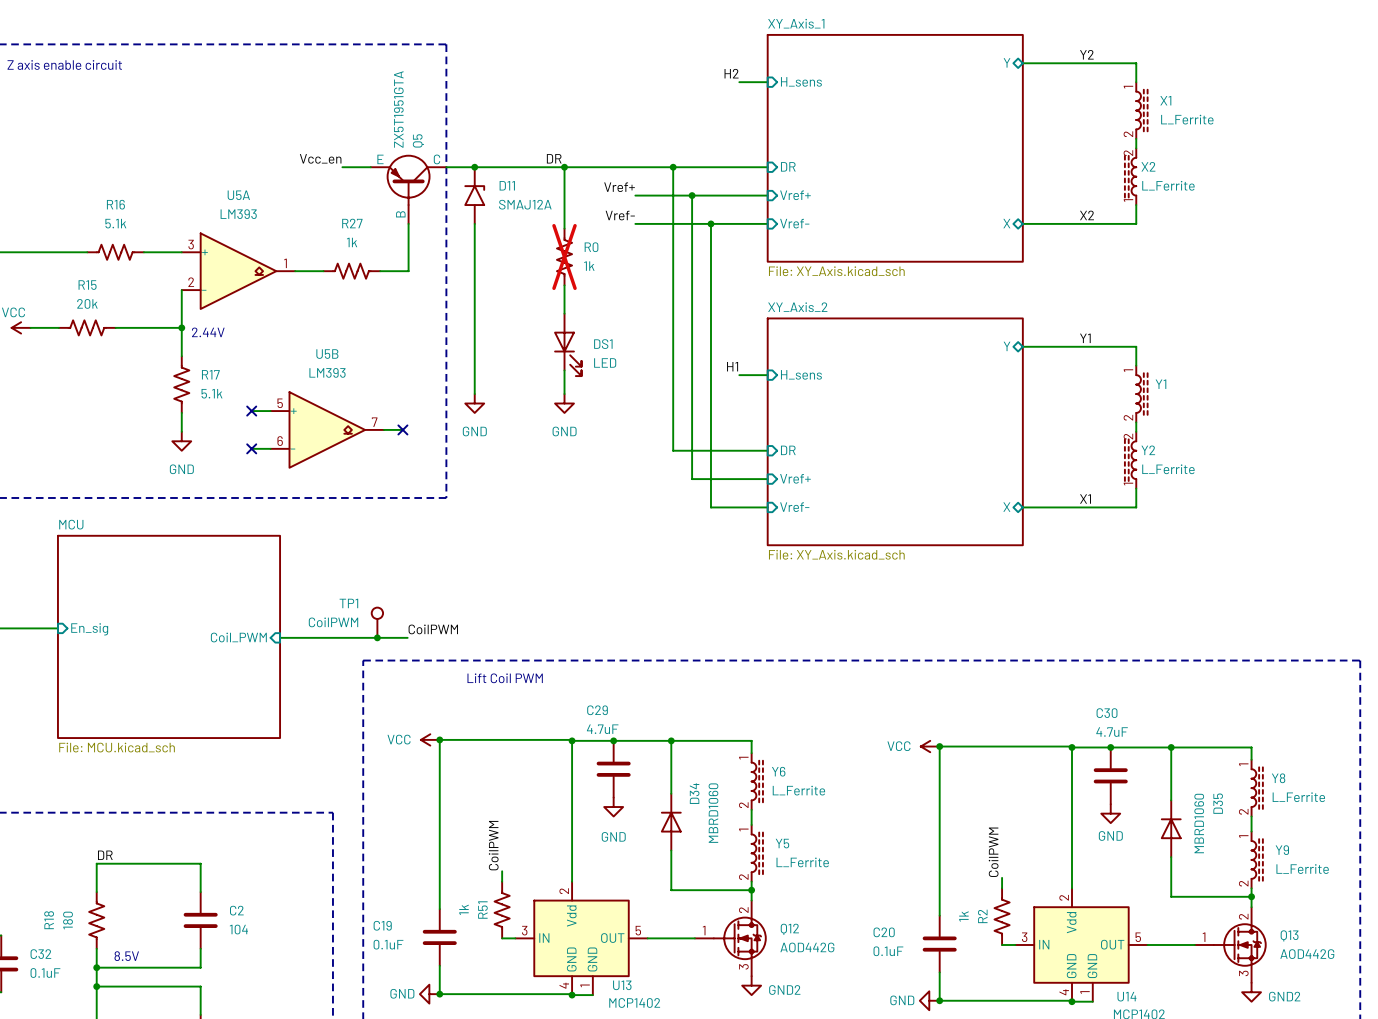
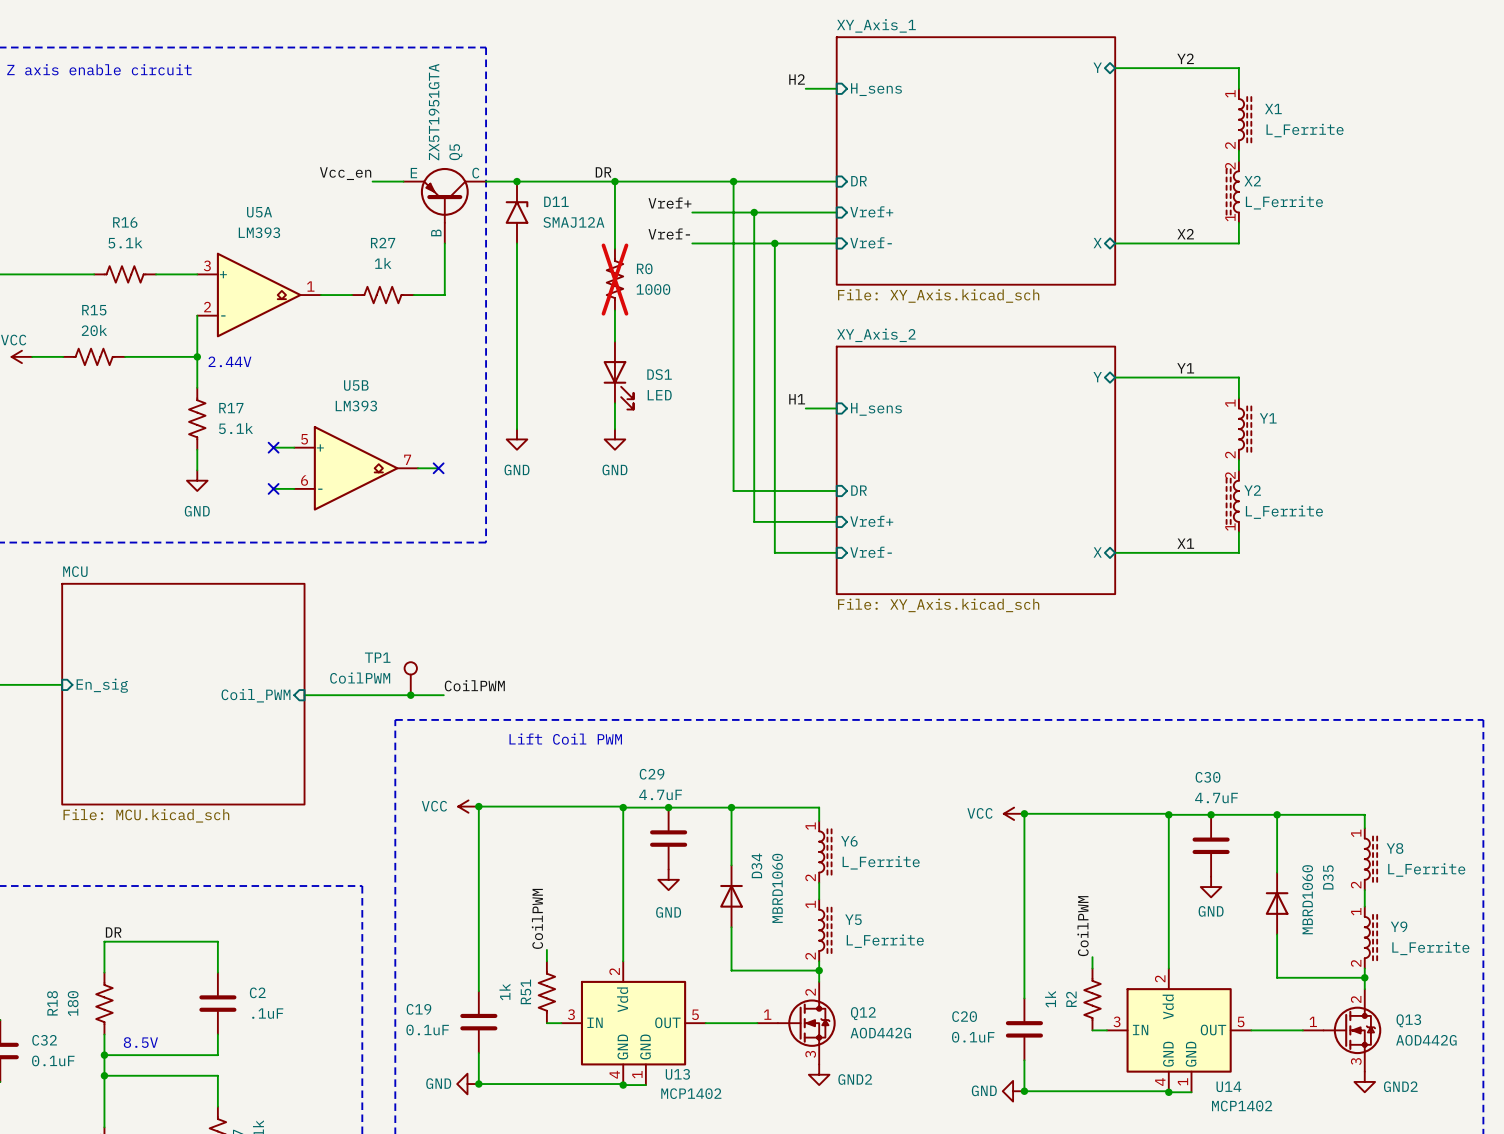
R0 value: 1k (589, 266) -> 1000 (653, 289)
C2 value: 104 (238, 929) -> .1uF (267, 1013)

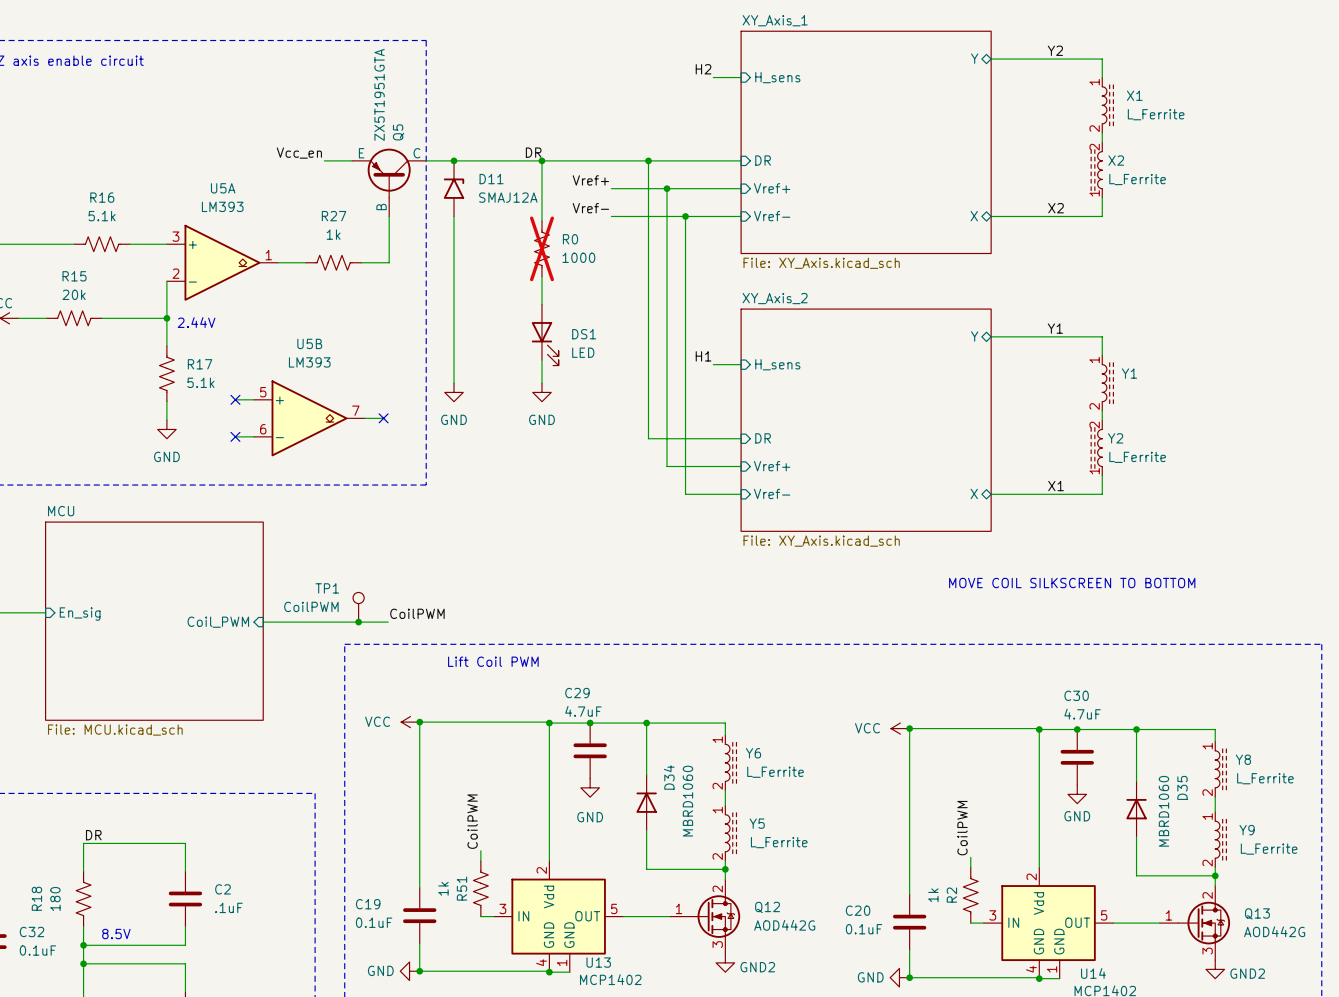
text: none -> MOVE COIL SILKSCREEN TO BOTTOM (1072, 583)

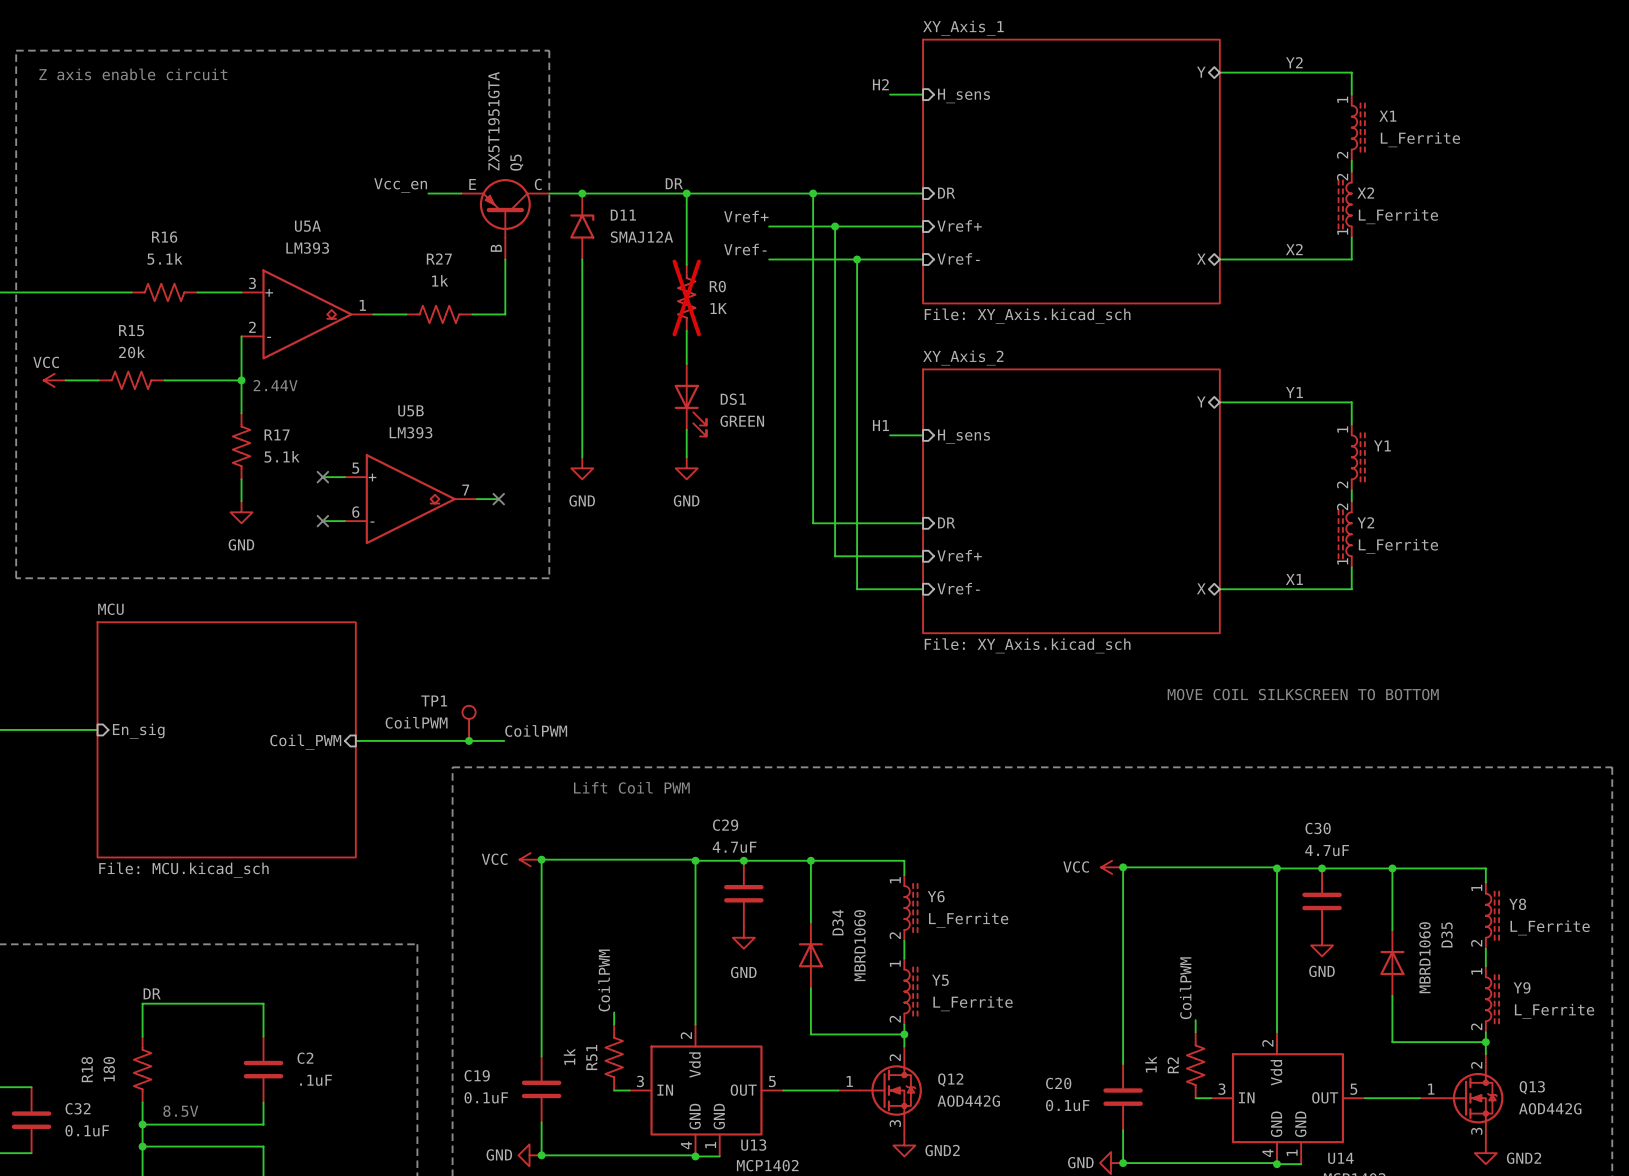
R0 value: 1000 (578, 257) -> 1K (718, 308)
DS1 value: LED (583, 352) -> GREEN (742, 421)

